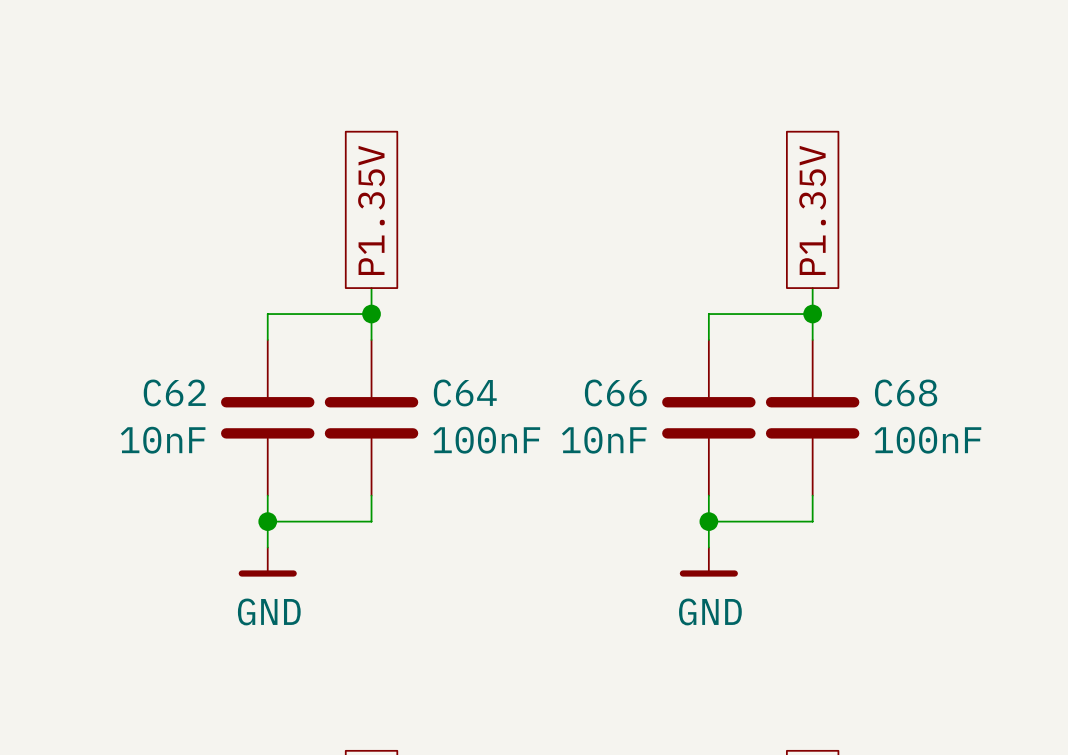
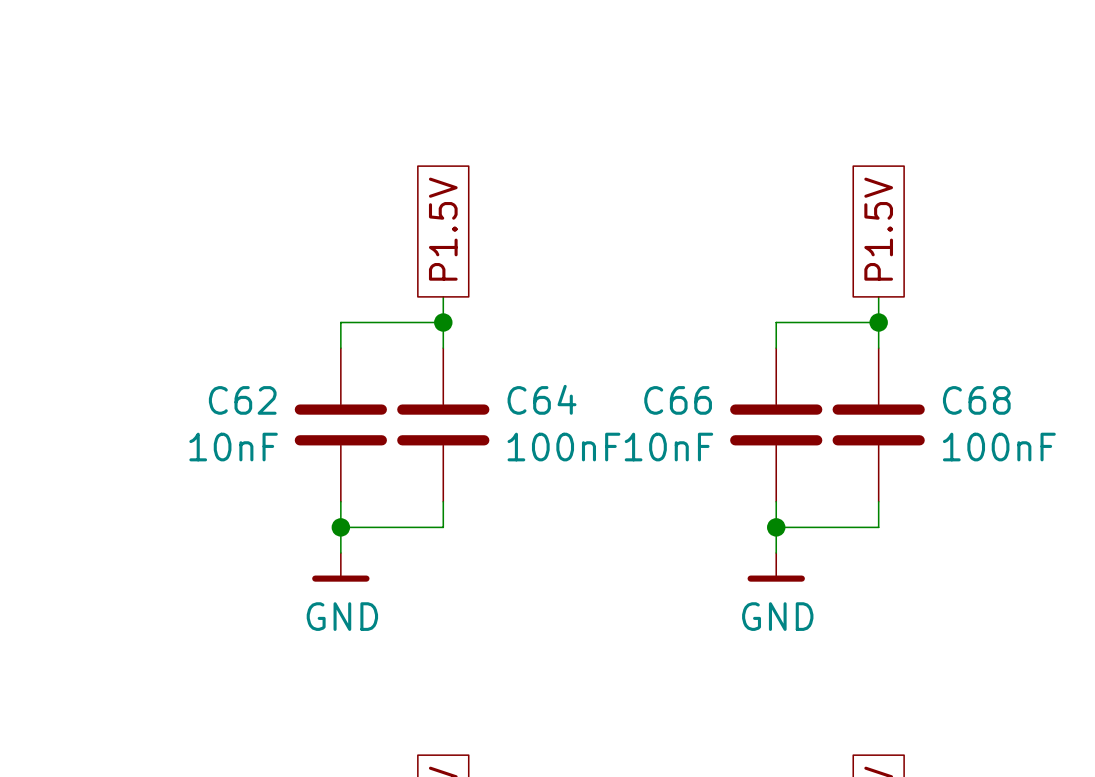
global label: P1.35V (371, 210) -> P1.5V (443, 229)
global label: P1.35V (812, 210) -> P1.5V (878, 229)

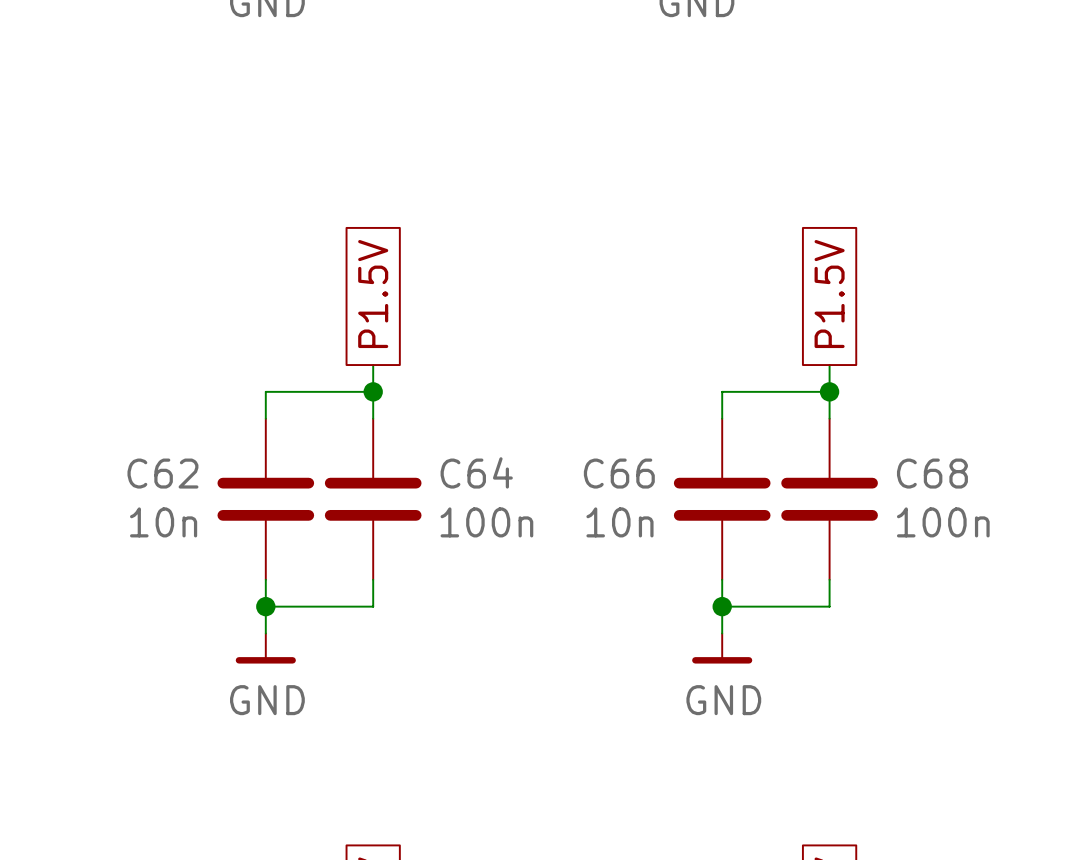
C62 value: 10nF (233, 447) -> 10n (163, 522)
C64 value: 100nF (563, 447) -> 100n (486, 522)
C66 value: 10nF (668, 447) -> 10n (619, 522)
C68 value: 100nF (999, 447) -> 100n (943, 522)

